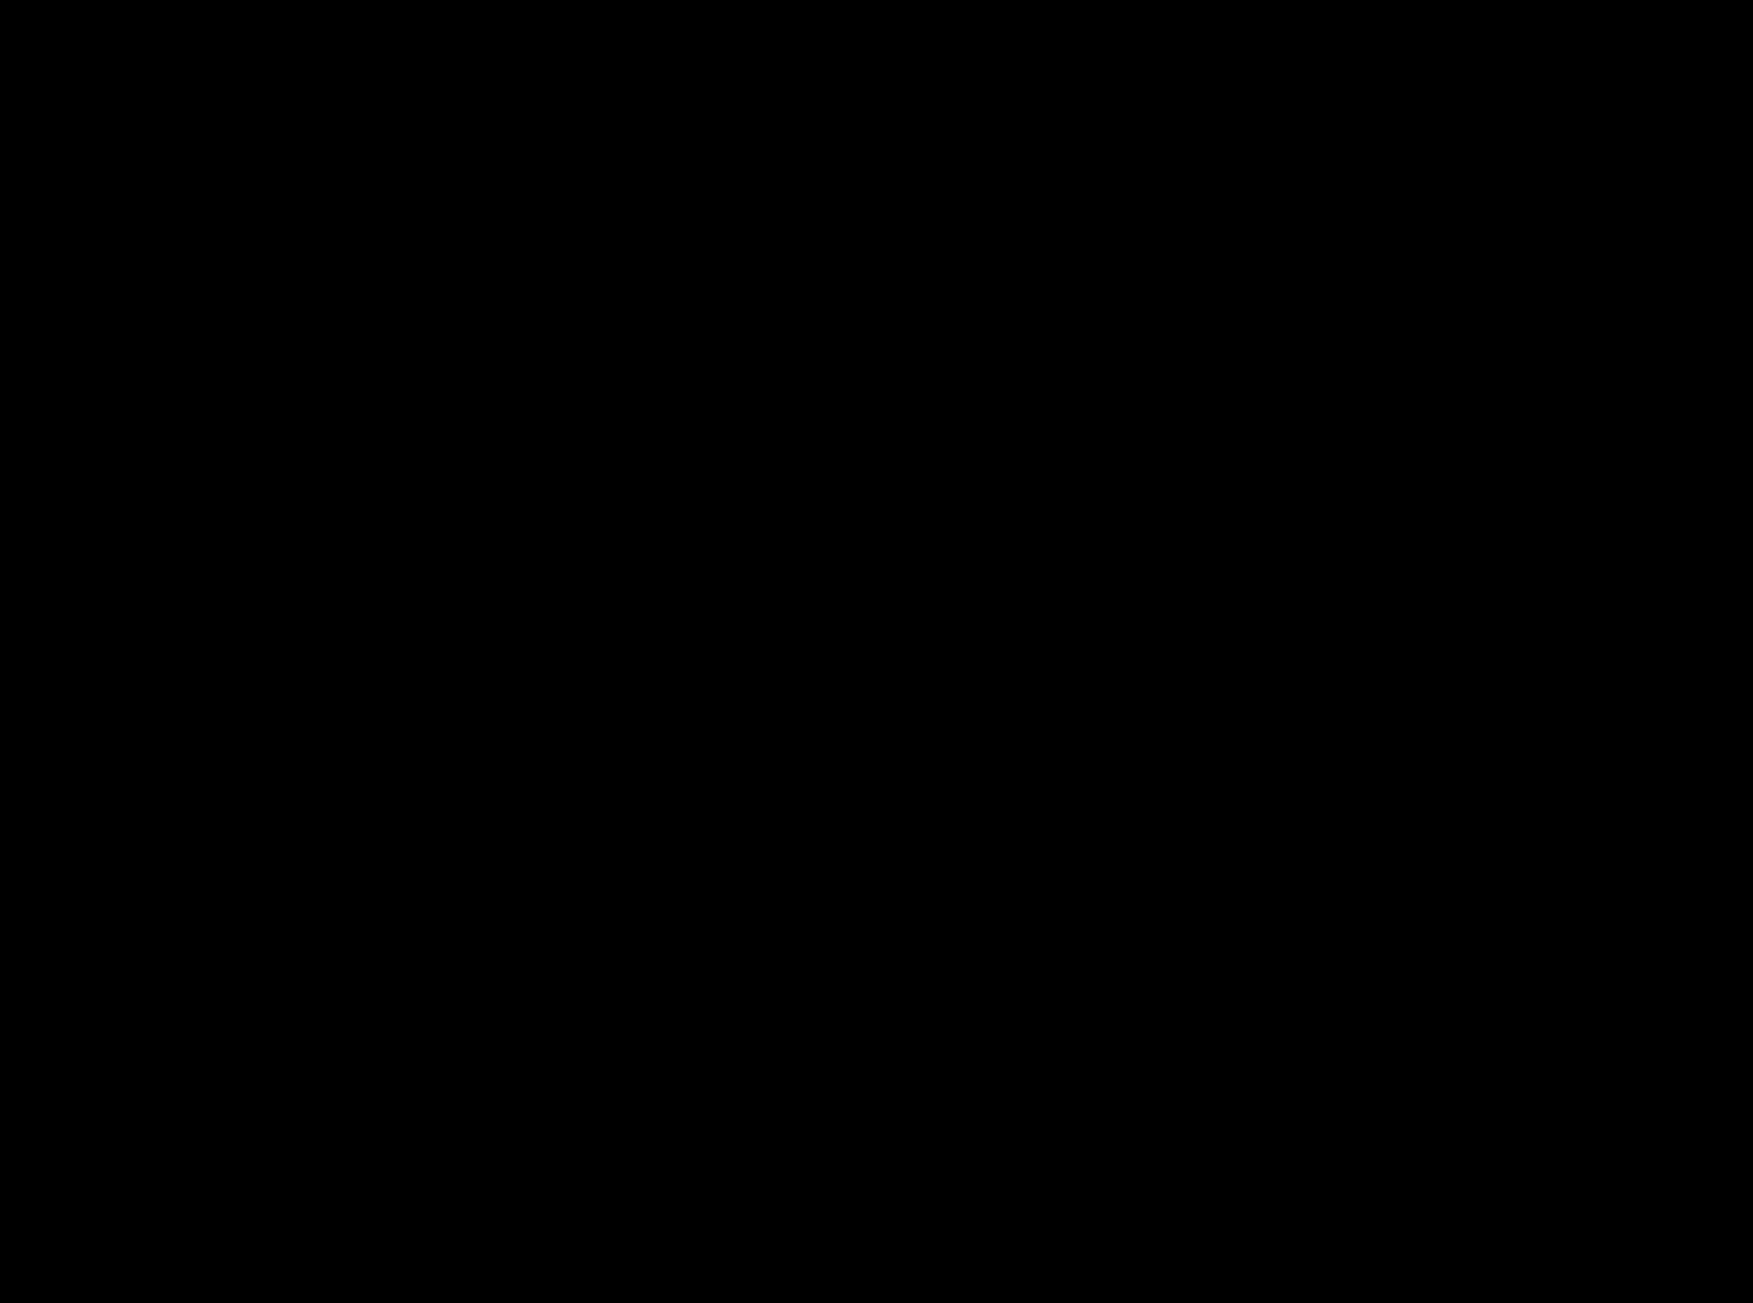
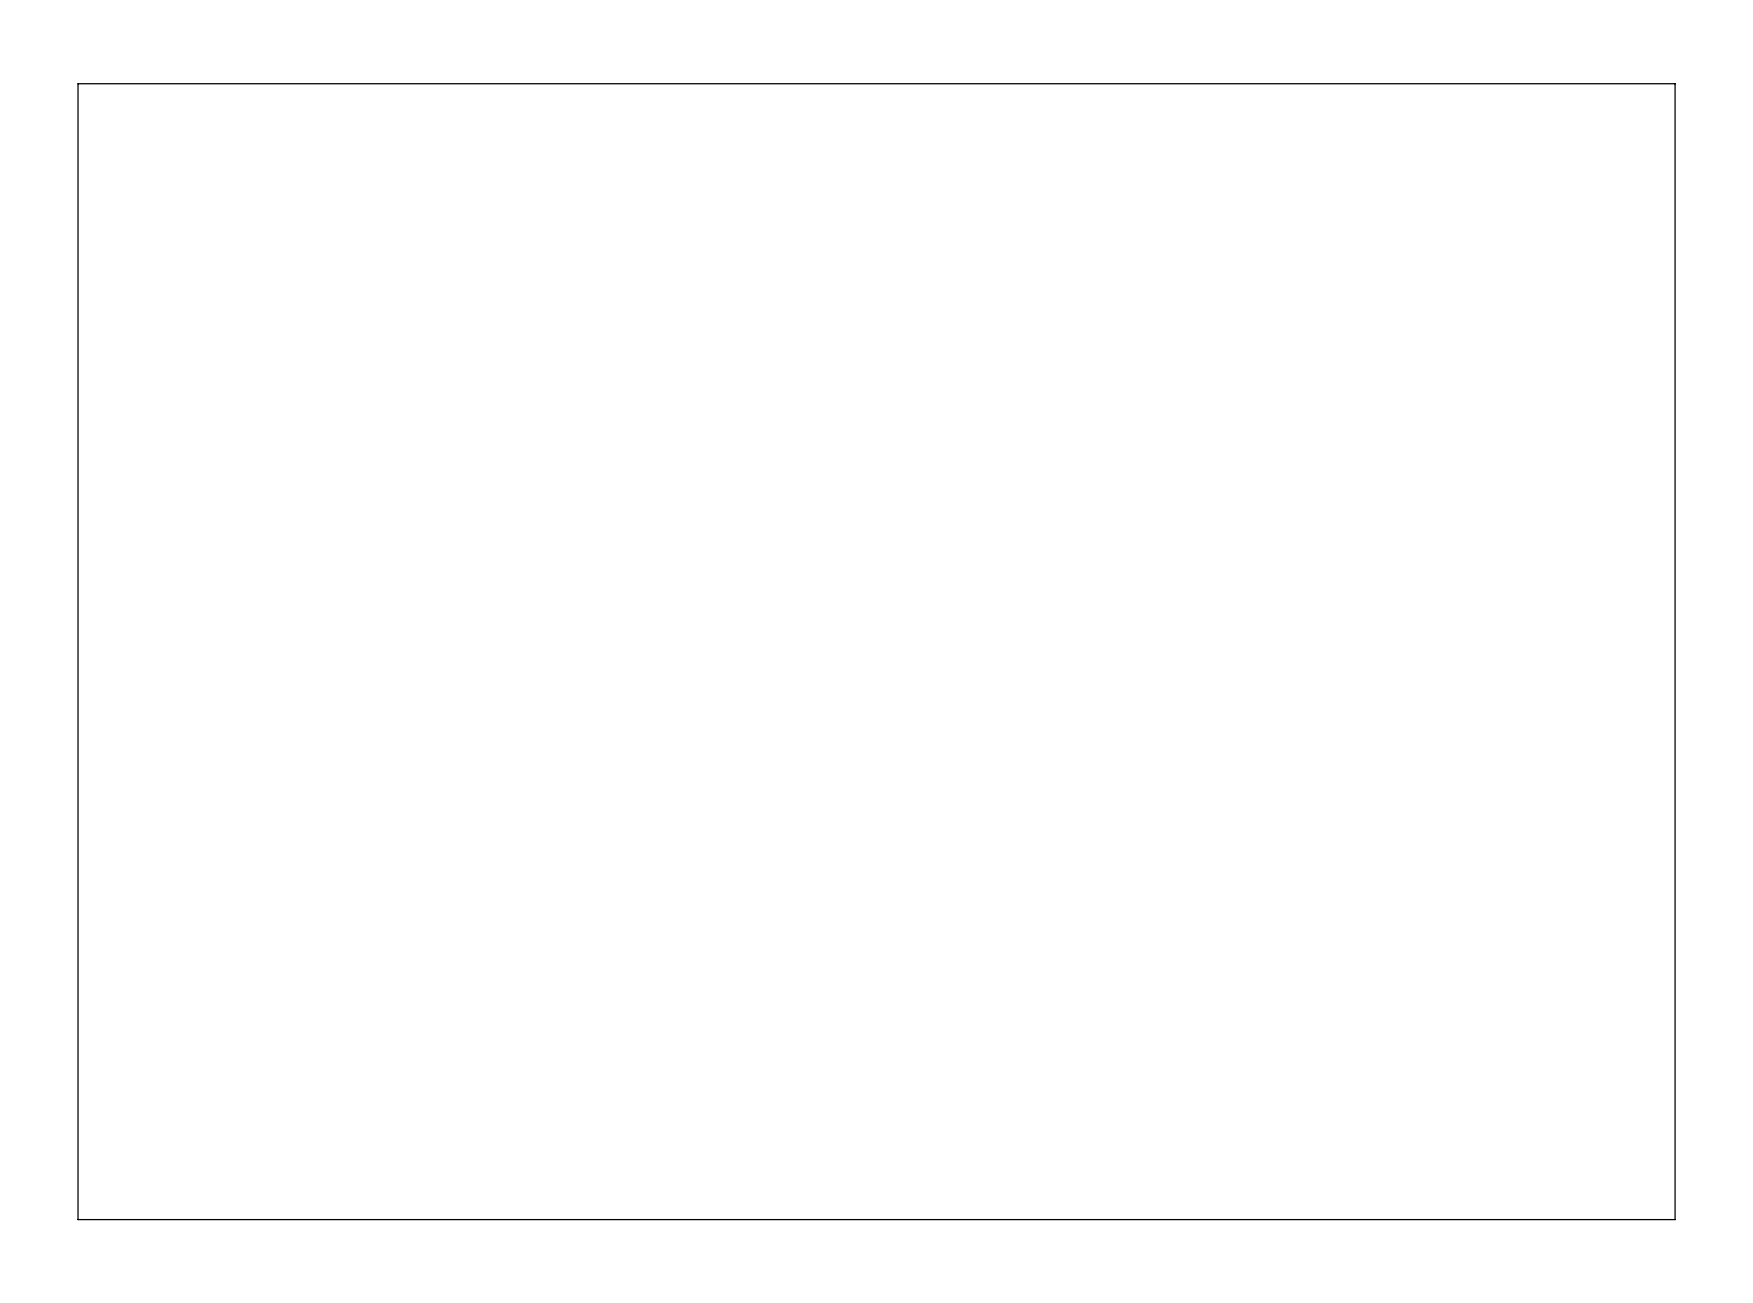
board edge: none -> (1675, 83) (78, 83) (78, 1219) (1675, 1219) (1675, 83)

